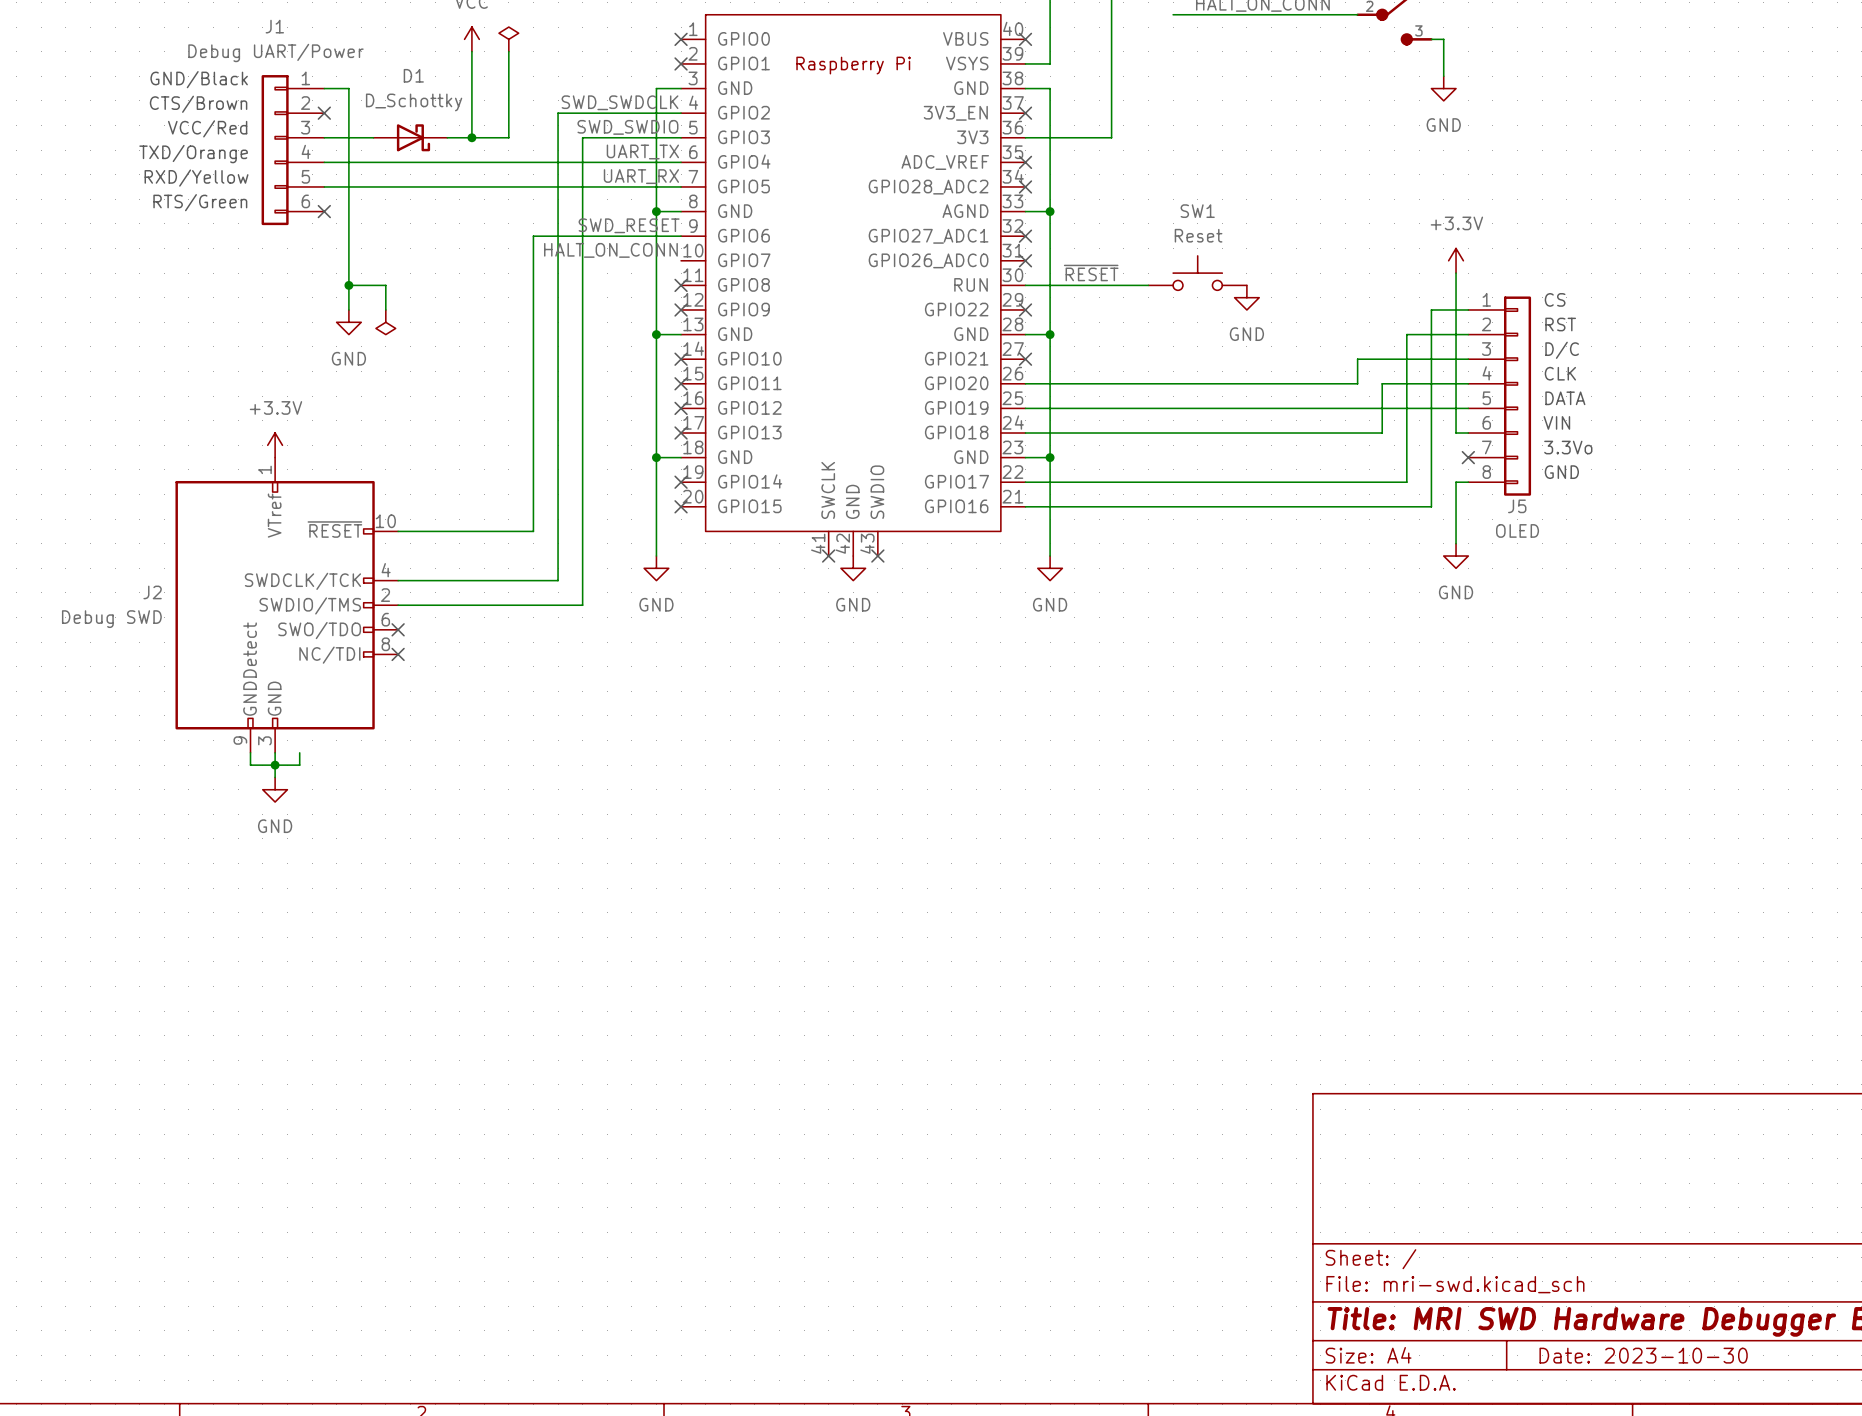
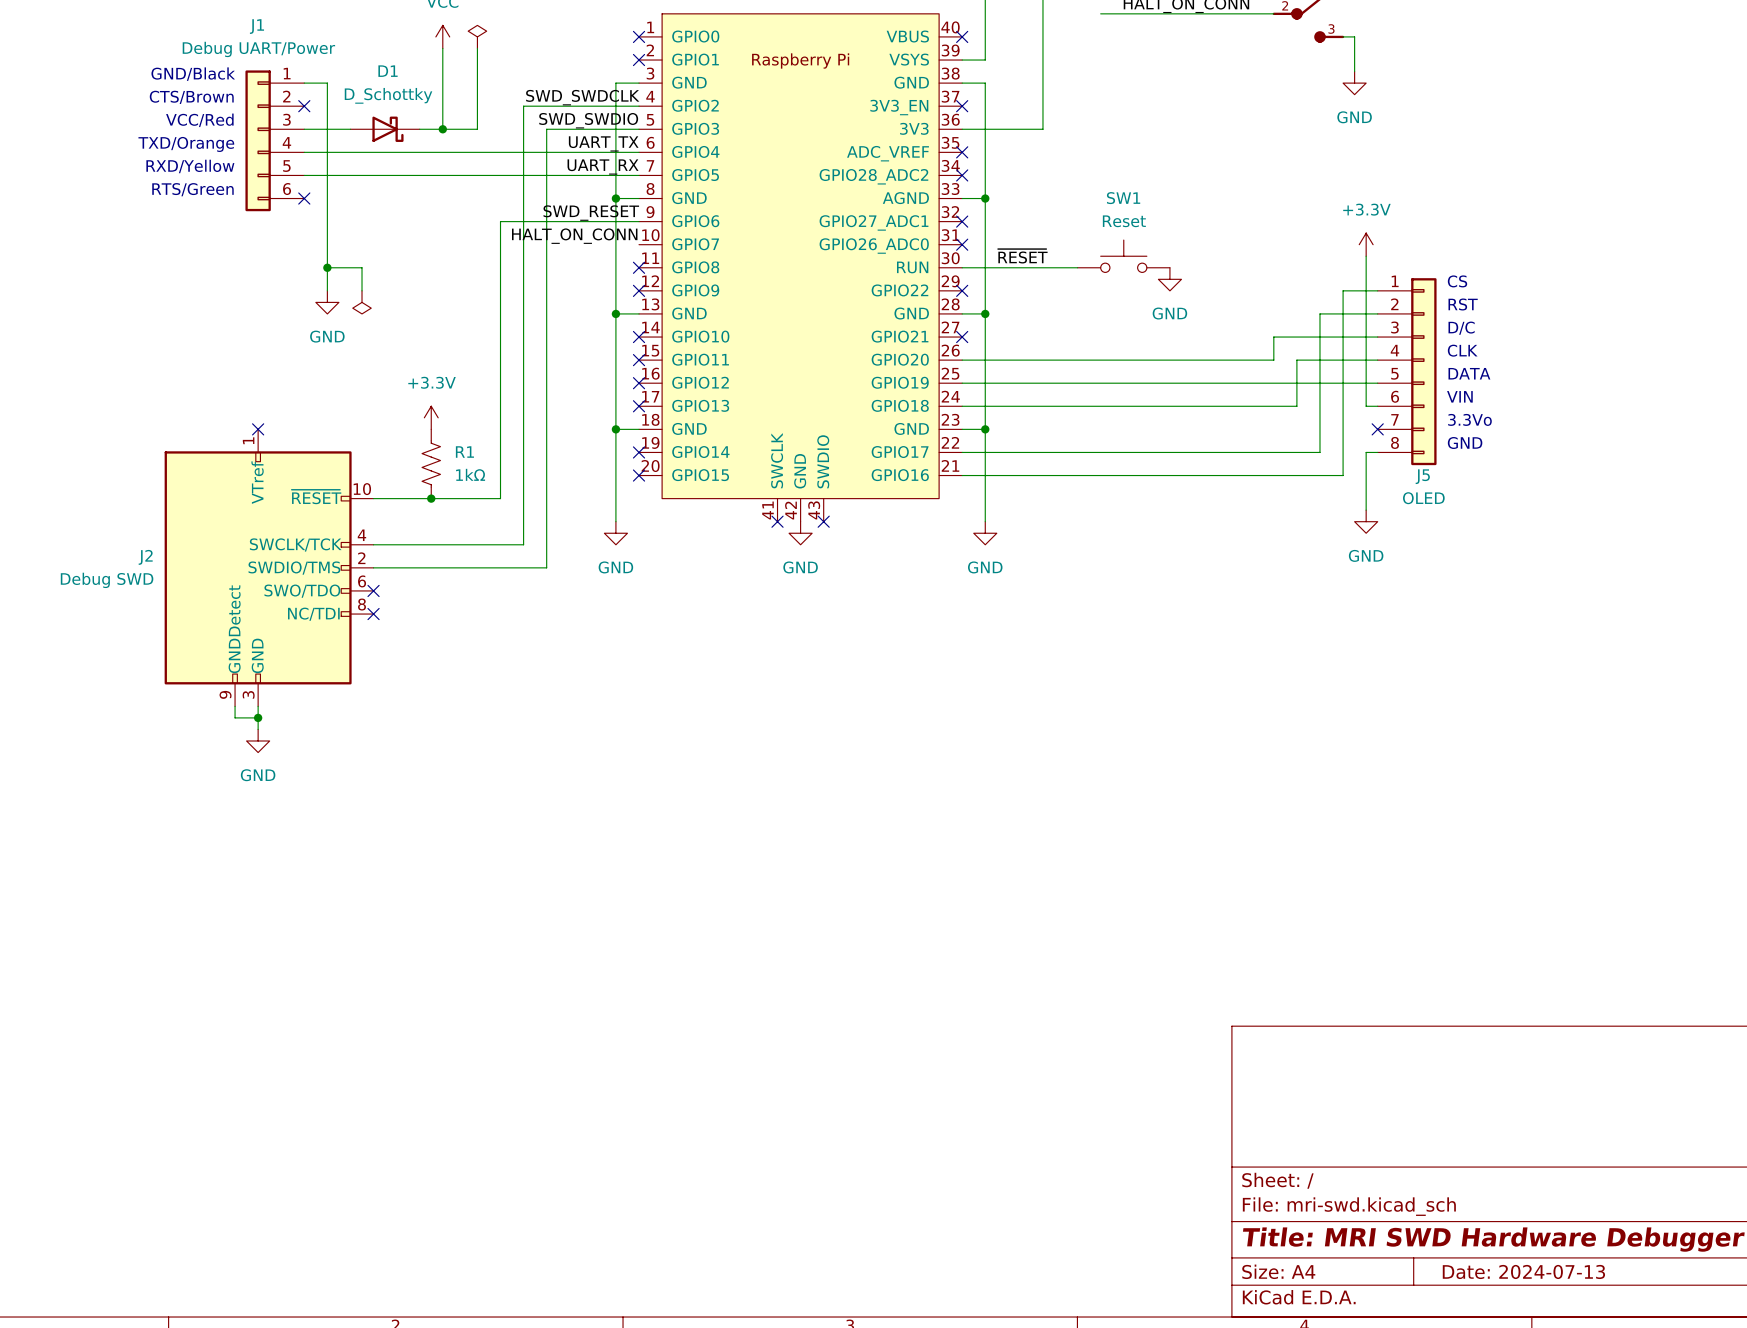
power symbol position: +3.3V (275, 445) -> +3.3V (431, 417)
no-connect mark: none -> (258, 429)
R1: none -> 1kΩ (431, 463)
junction: none -> (431, 498)
J2 pin name: SWDCLK/TCK (302, 581) -> SWCLK/TCK (295, 544)
wire: (299, 752) (299, 765) (275, 765) -> none
title block: Date: 2023-10-30 (1643, 1355) -> Date: 2024-07-13 (1523, 1271)

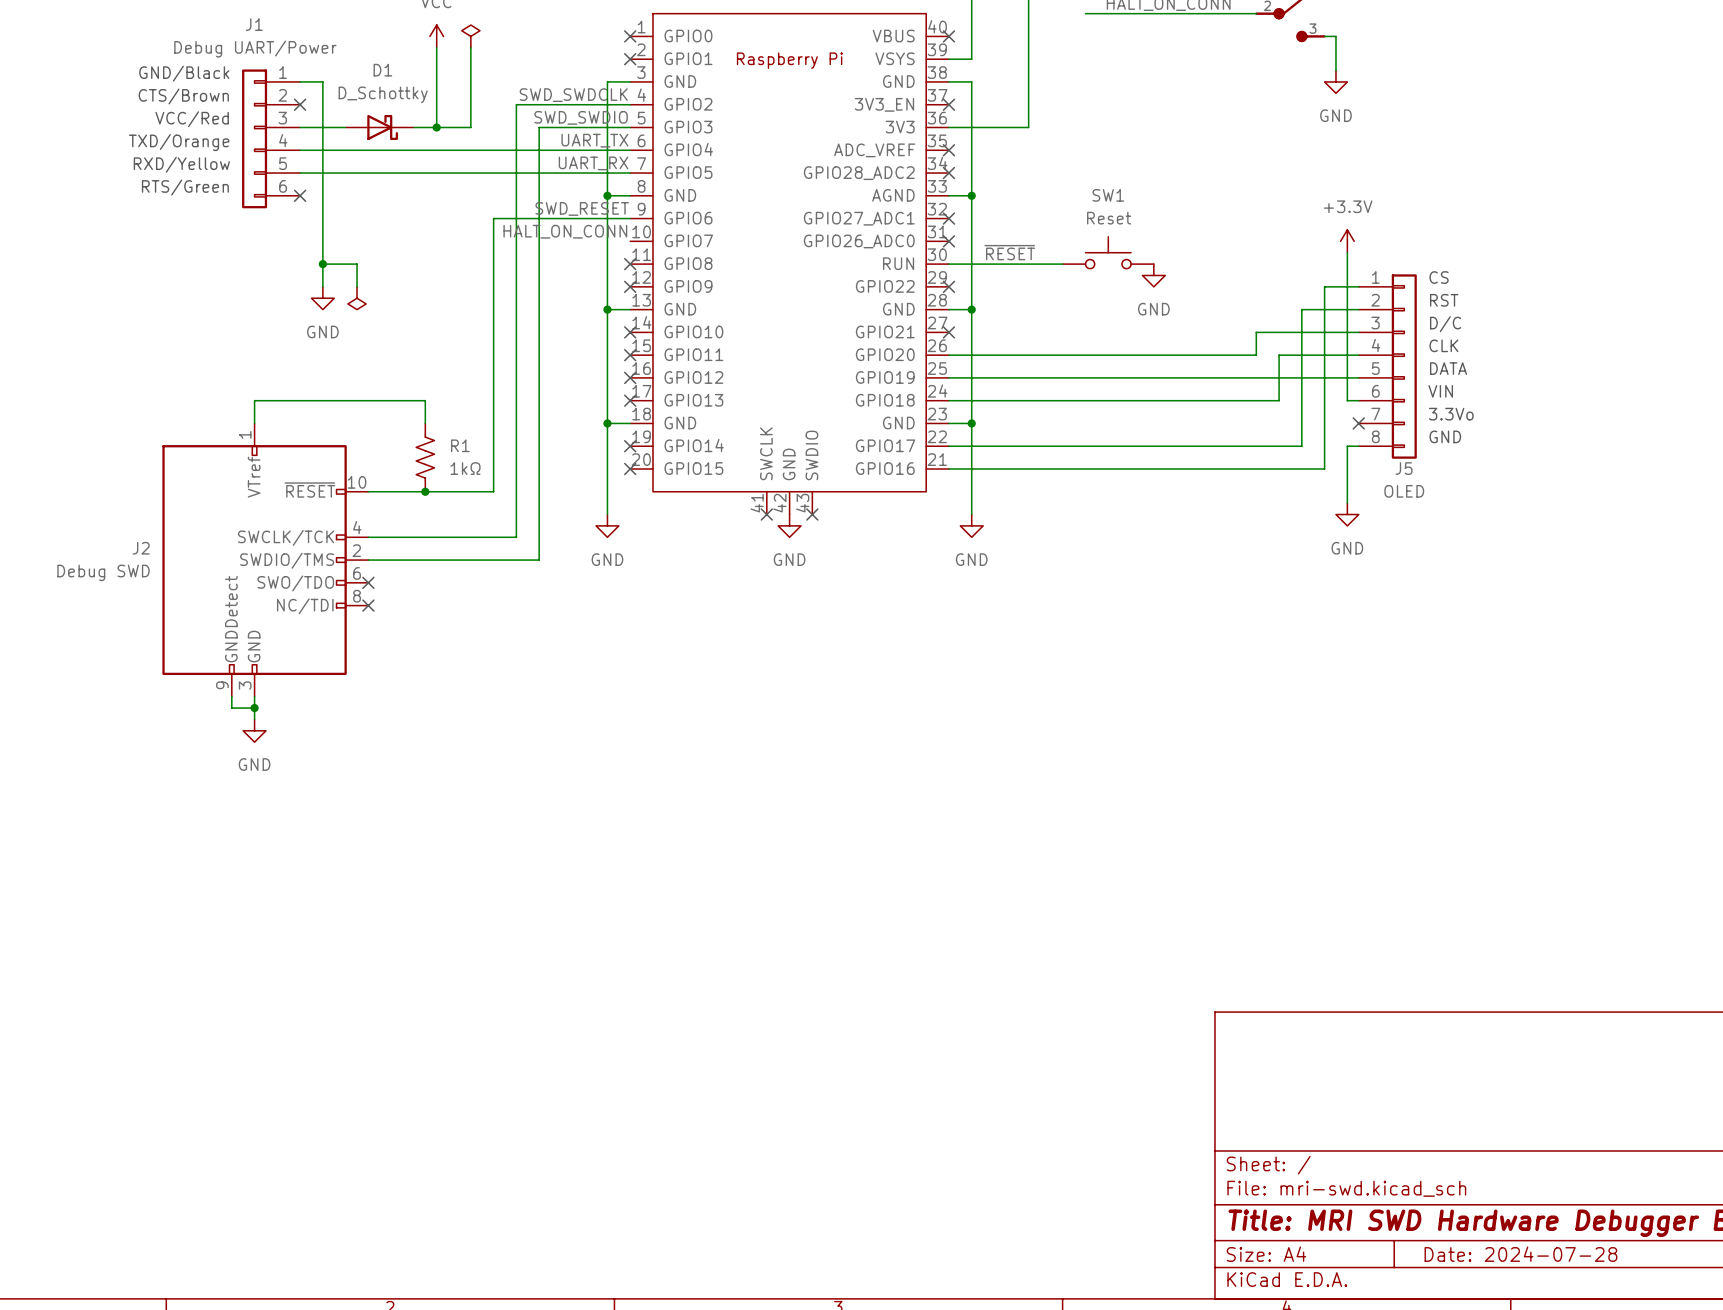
power symbol: +3.3V (431, 417) -> none
wire: none -> (254, 423) (254, 400) (425, 400) (425, 423)
no-connect mark: (258, 429) -> none
title block: Date: 2024-07-13 (1523, 1271) -> Date: 2024-07-28 (1520, 1254)

